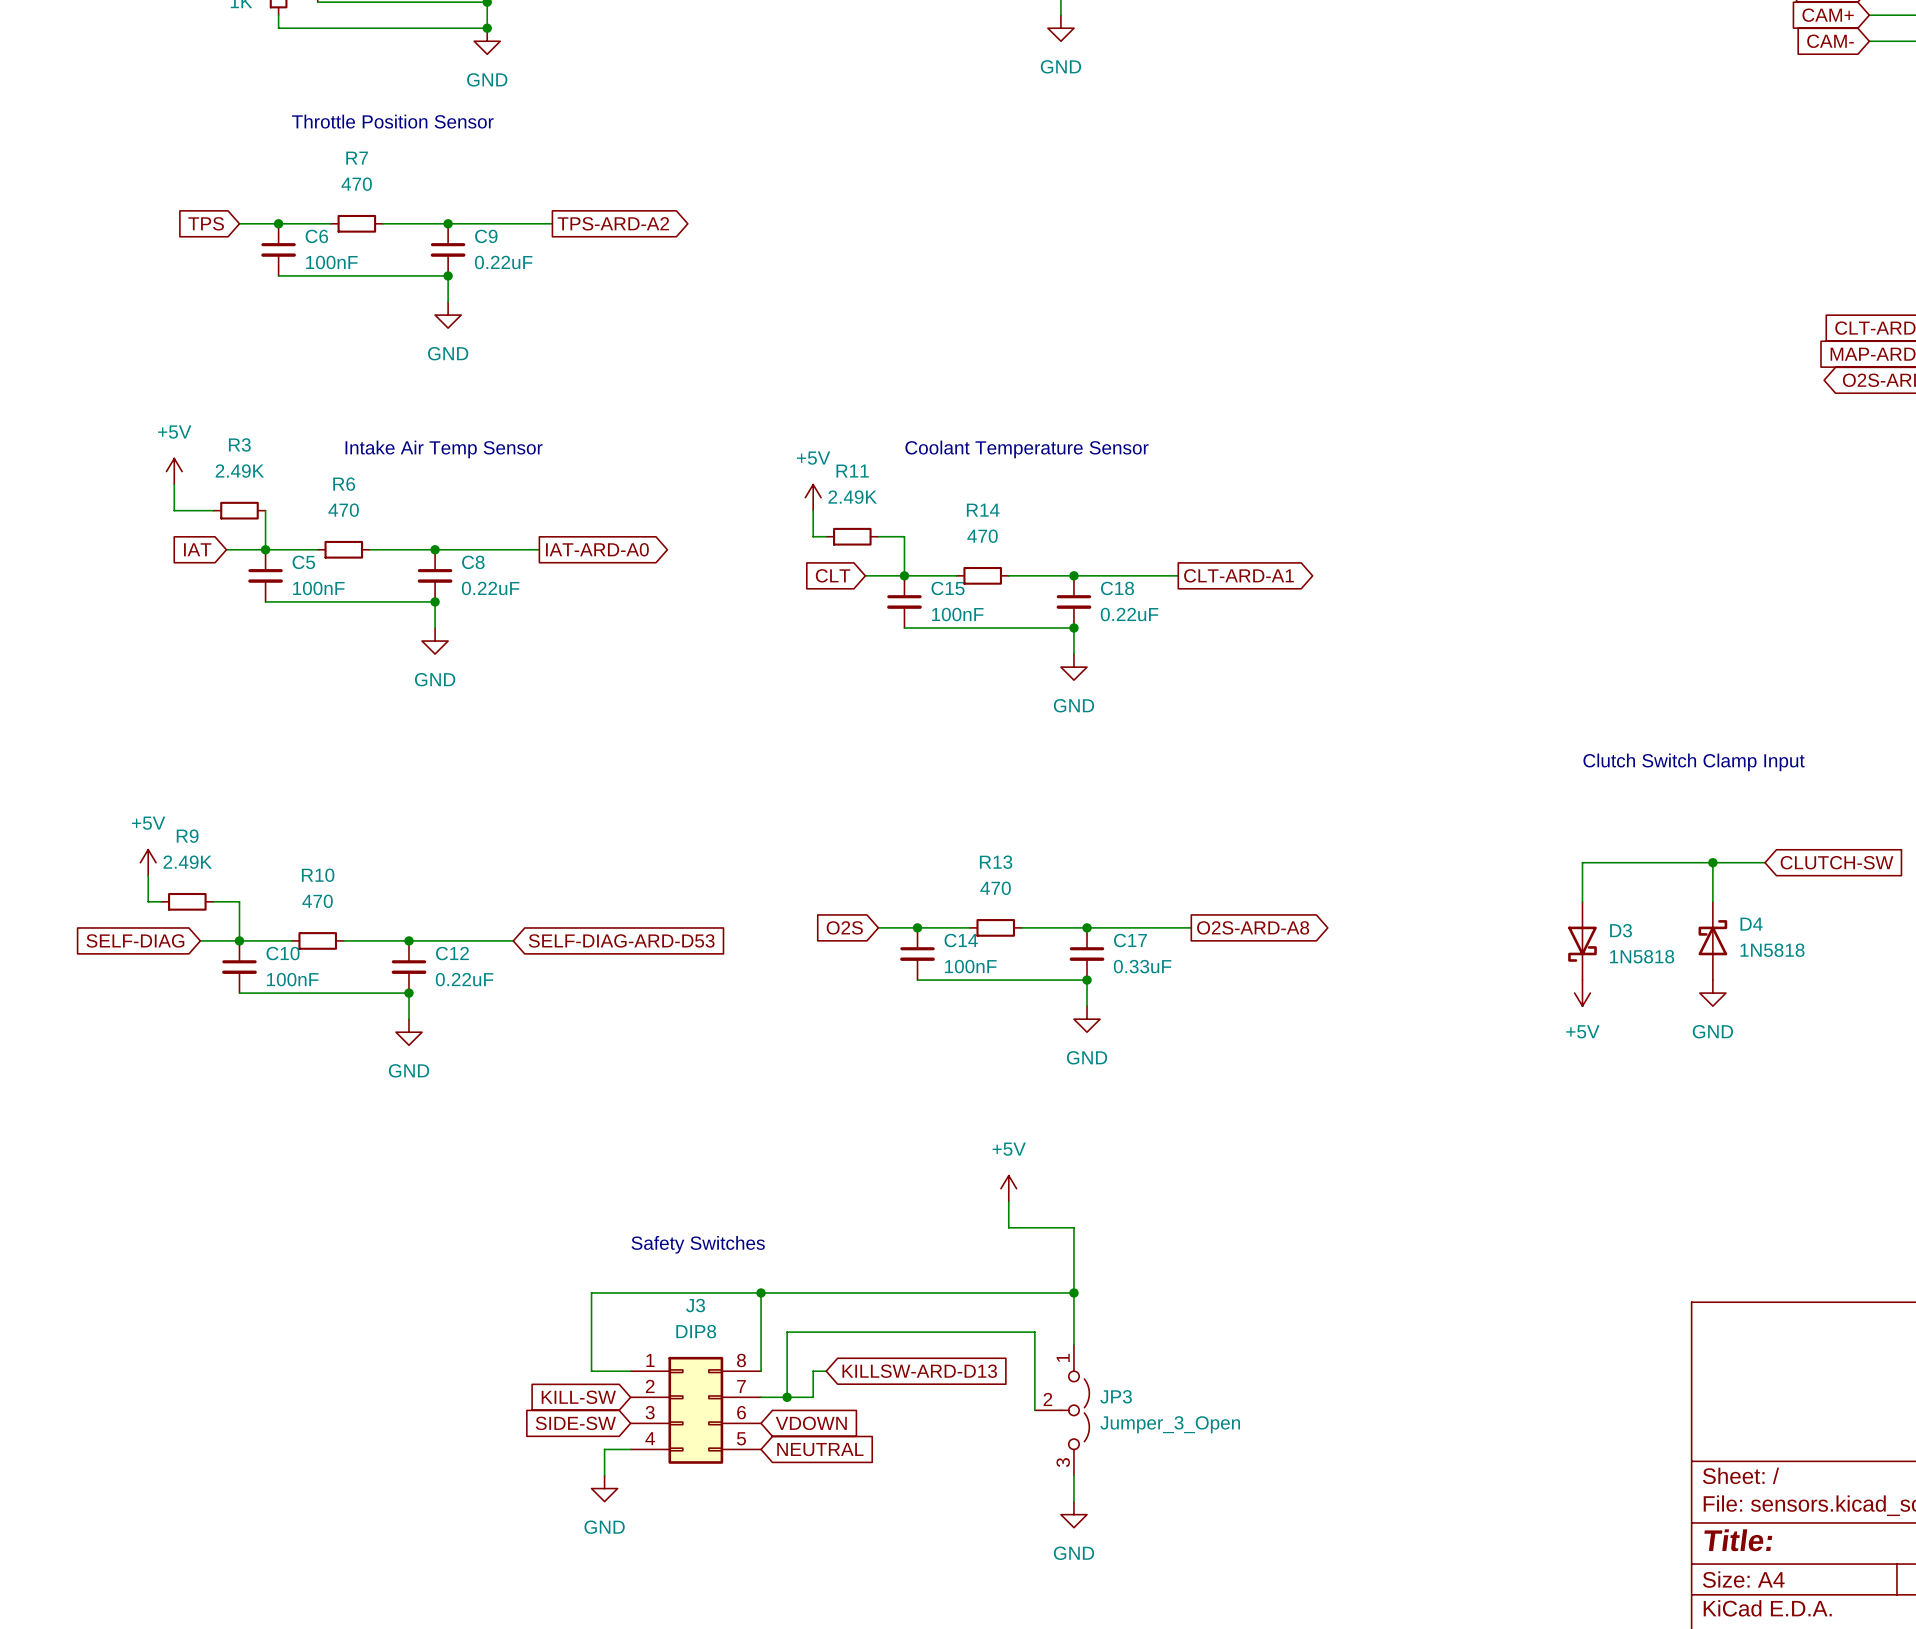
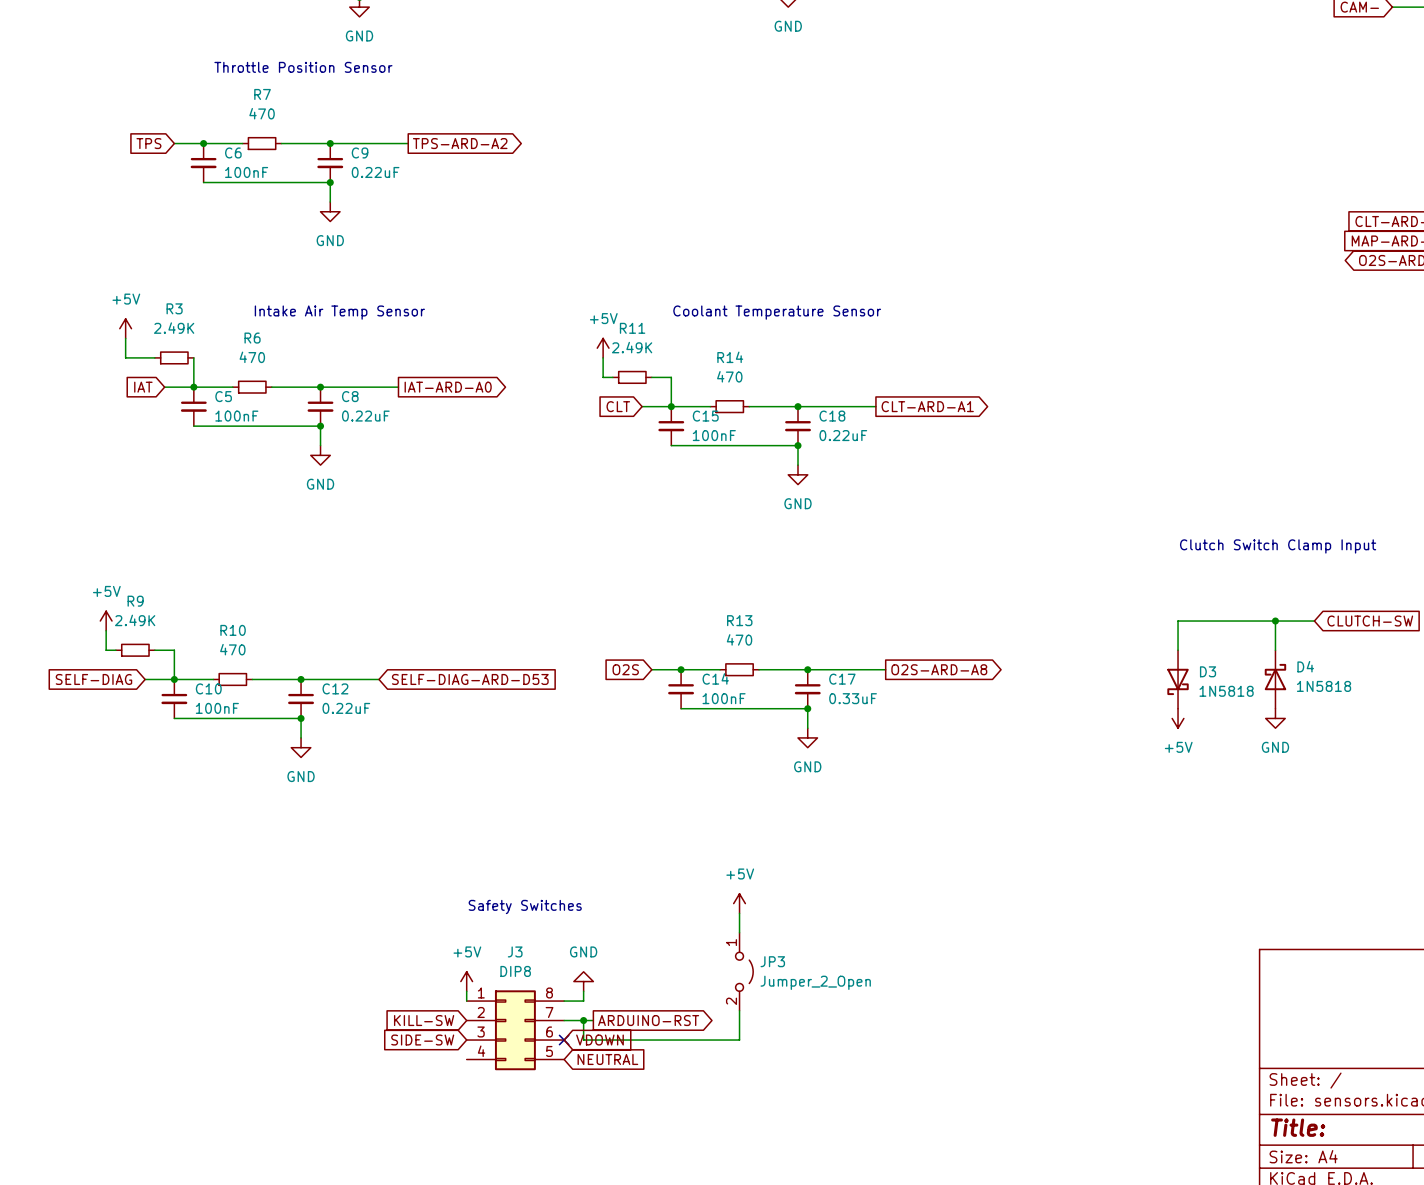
power symbol position: +5V (1008, 1188) -> +5V (739, 903)
wire: (1008, 1201) (1008, 1227) (1073, 1227) (1073, 1345) -> none
wire: (761, 1292) (761, 1371) -> none
junction: (761, 1292) -> none
wire: (1073, 1292) (591, 1292) (591, 1371) (630, 1371) -> (466, 991) (466, 1001)
junction: (1073, 1292) -> none
power symbol: none -> +5V (466, 981)
power symbol: none -> GND (583, 981)
JP3 symbol: [1034, 1345, 1090, 1476] -> [735, 932, 754, 1011]
wire: (787, 1358) (787, 1332) (1034, 1332) (1034, 1410) -> none
wire: (787, 1371) (787, 1397) -> (583, 1001) (564, 1001)
wire: (826, 1371) (813, 1371) (813, 1397) (800, 1397) -> none
global label: KILLSW-ARD-D13 (919, 1371) -> none
wire: none -> (739, 1010) (739, 1040) (583, 1040) (583, 1020)
global label: none -> ARDUINO-RST (648, 1020)
no-connect mark: none -> (564, 1040)
JP3 value: Jumper_3_Open (1170, 1424) -> Jumper_2_Open (815, 982)
wire: (630, 1449) (604, 1449) (604, 1475) -> none
wire: (1073, 1475) (1073, 1501) -> (739, 913) (739, 932)
power symbol: GND (604, 1488) -> none
power symbol: GND (1073, 1514) -> none

